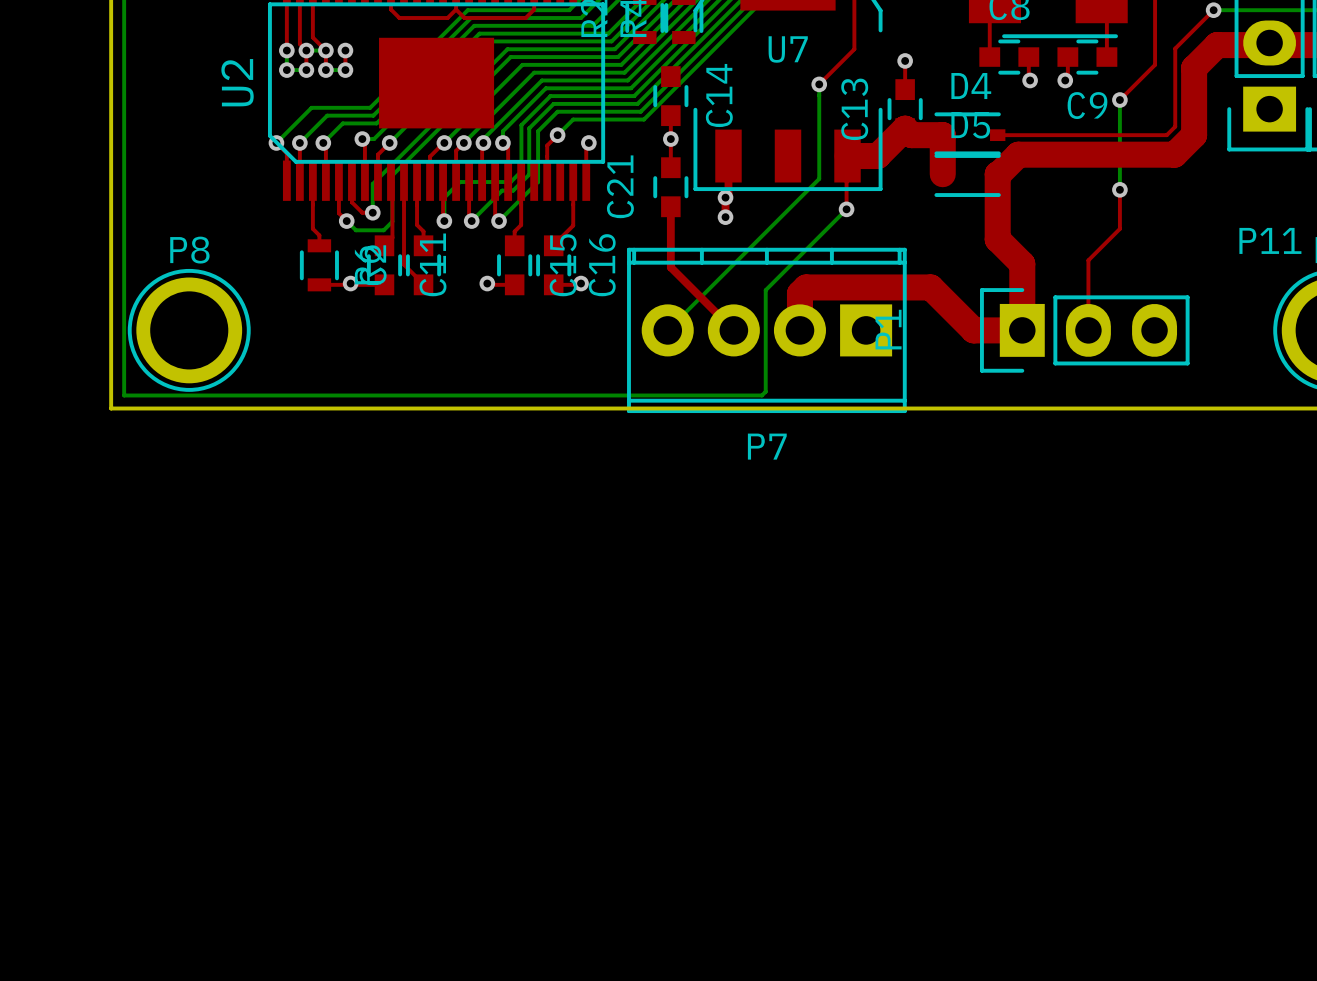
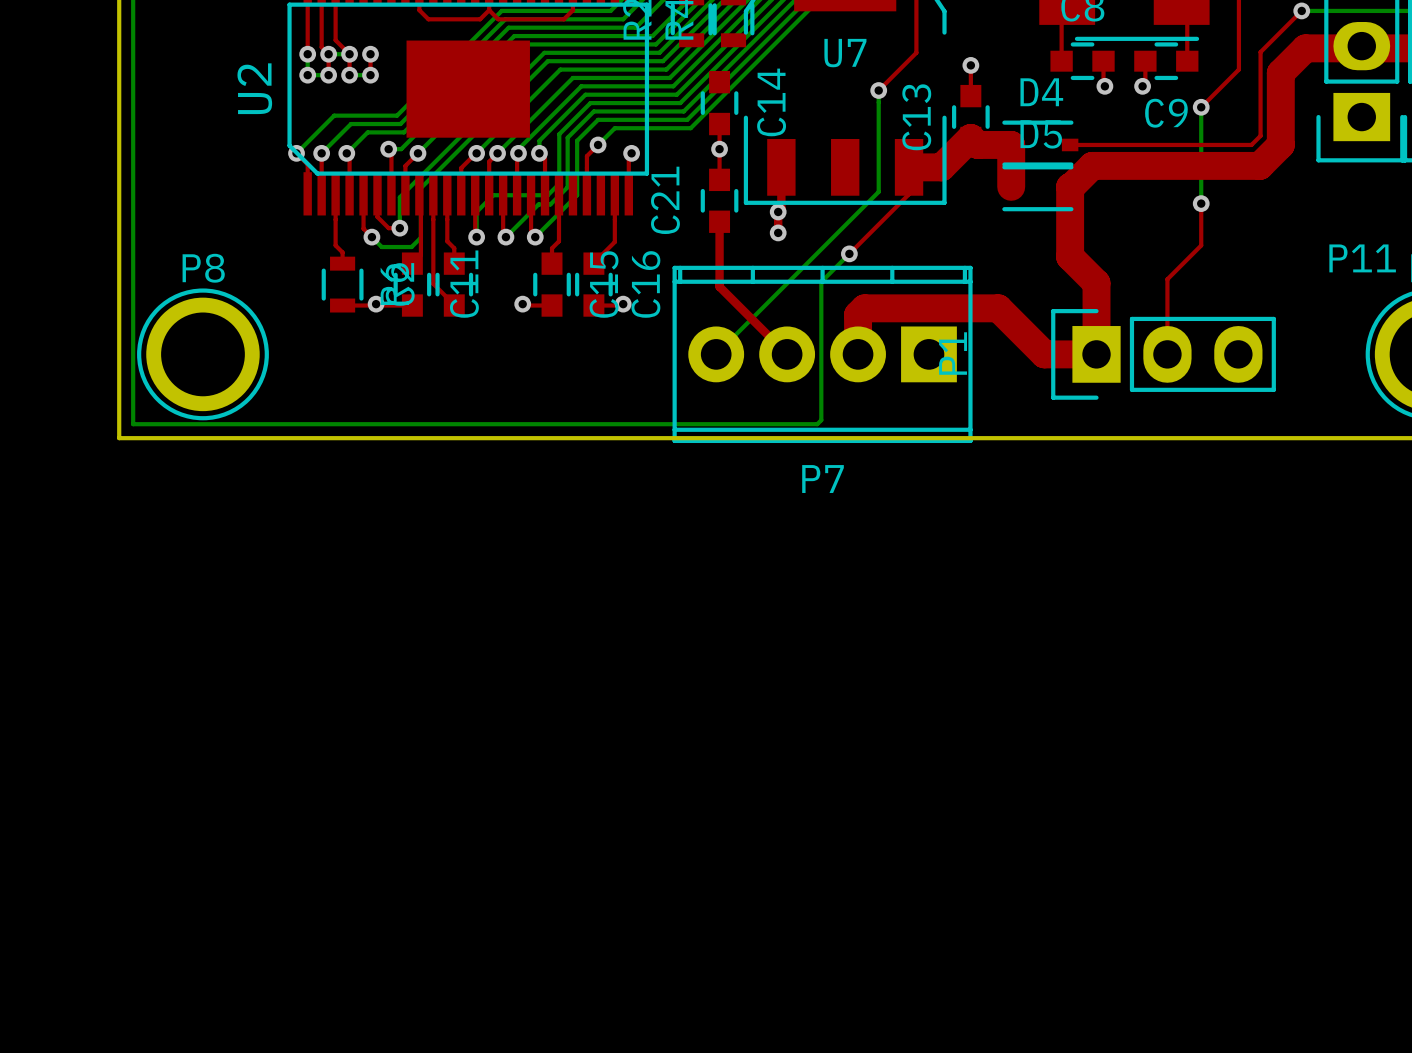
top track: (846, 182) (846, 209) -> (908, 195) (849, 253)
bottom track: (846, 209) (765, 290) -> (849, 253) (821, 281) (821, 311)
via position: (846, 209) -> (849, 253)

